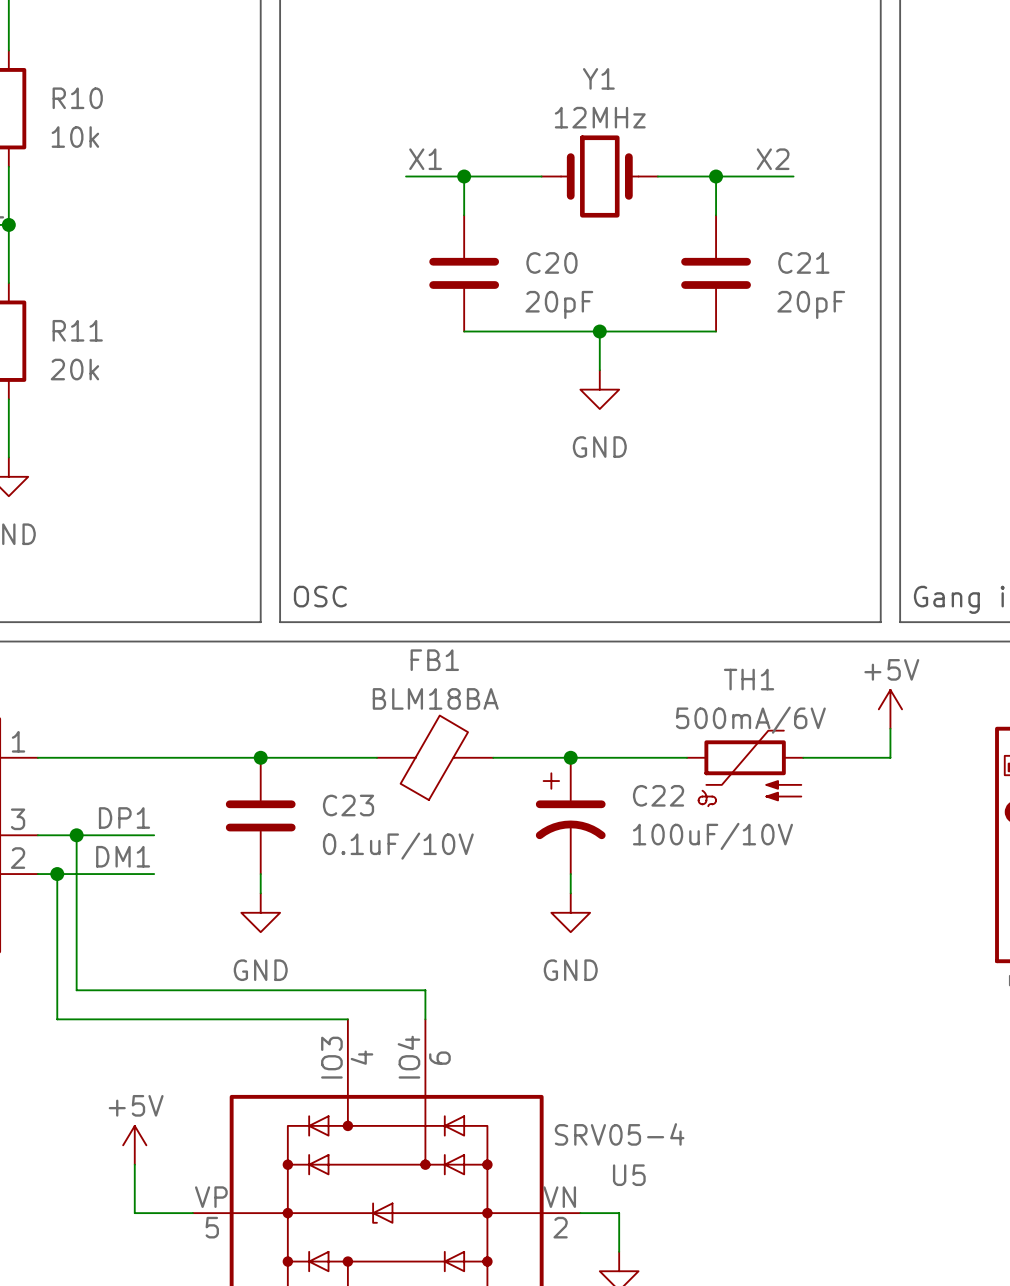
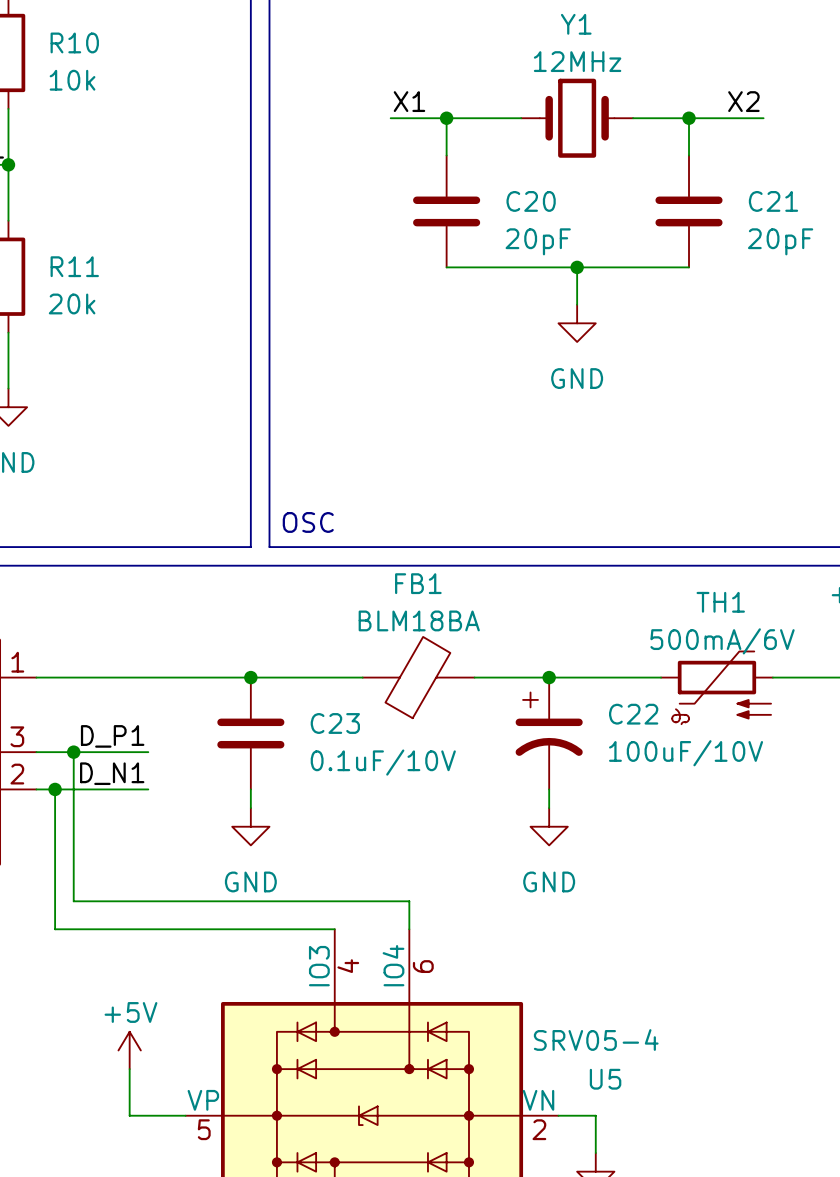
label: DP1 (124, 817) -> D_P1 (112, 736)
label: DM1 (123, 856) -> D_N1 (112, 773)

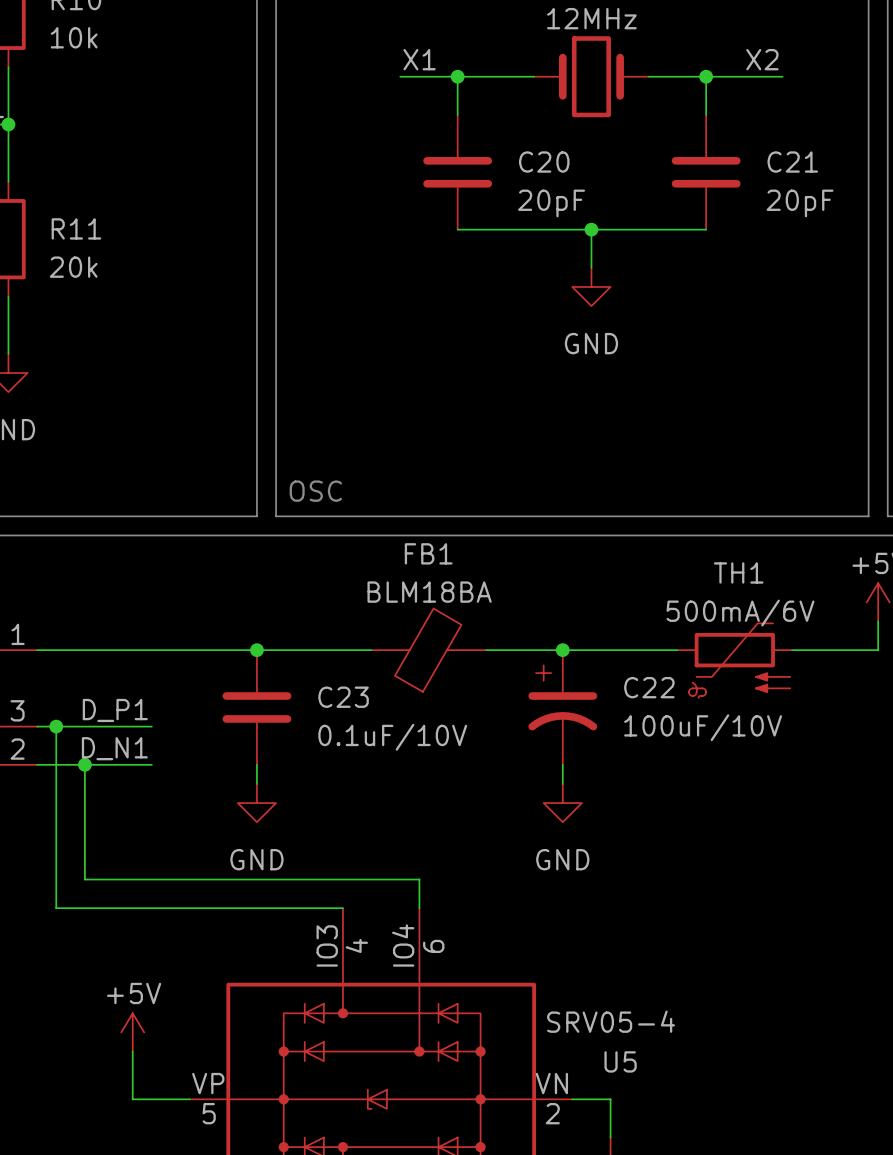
wire: none -> (56, 726) (56, 764)
junction: none -> (56, 726)
wire: (73, 752) (73, 901) (83, 901) -> (84, 764) (84, 879)
junction: (73, 752) -> none
junction: (55, 789) -> none
junction: none -> (84, 764)

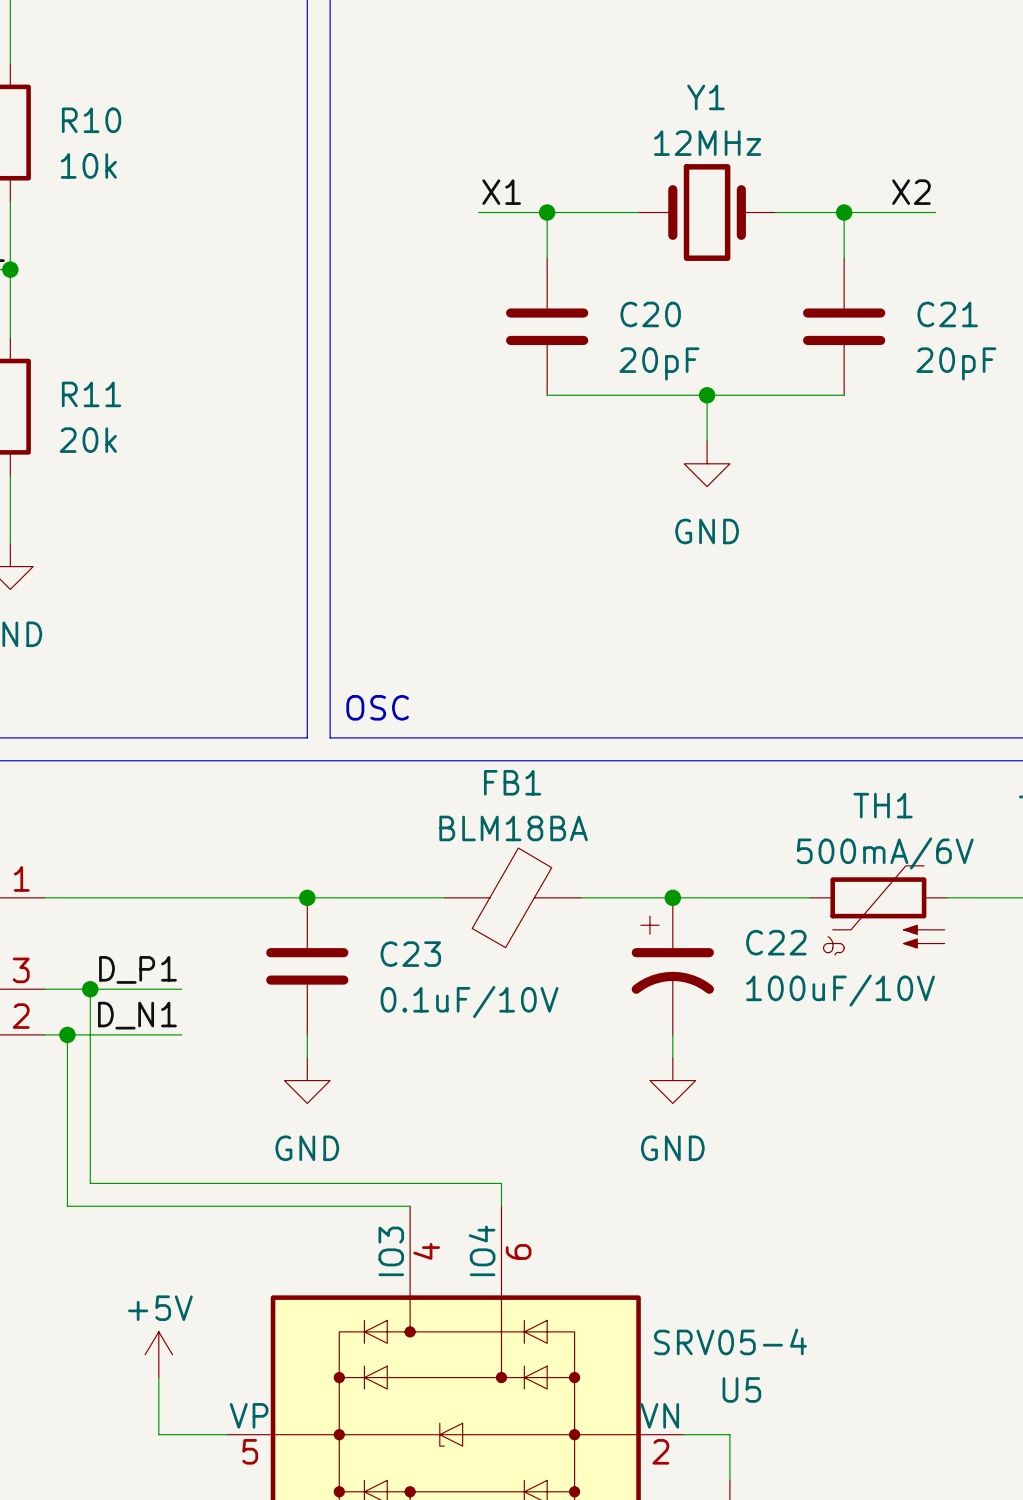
wire: (56, 726) (56, 764) -> none
junction: (56, 726) -> none
junction: none -> (90, 989)
junction: none -> (67, 1034)
wire: (84, 764) (84, 879) (419, 879) (419, 889) -> (90, 989) (90, 1183) (501, 1183)
junction: (84, 764) -> none

